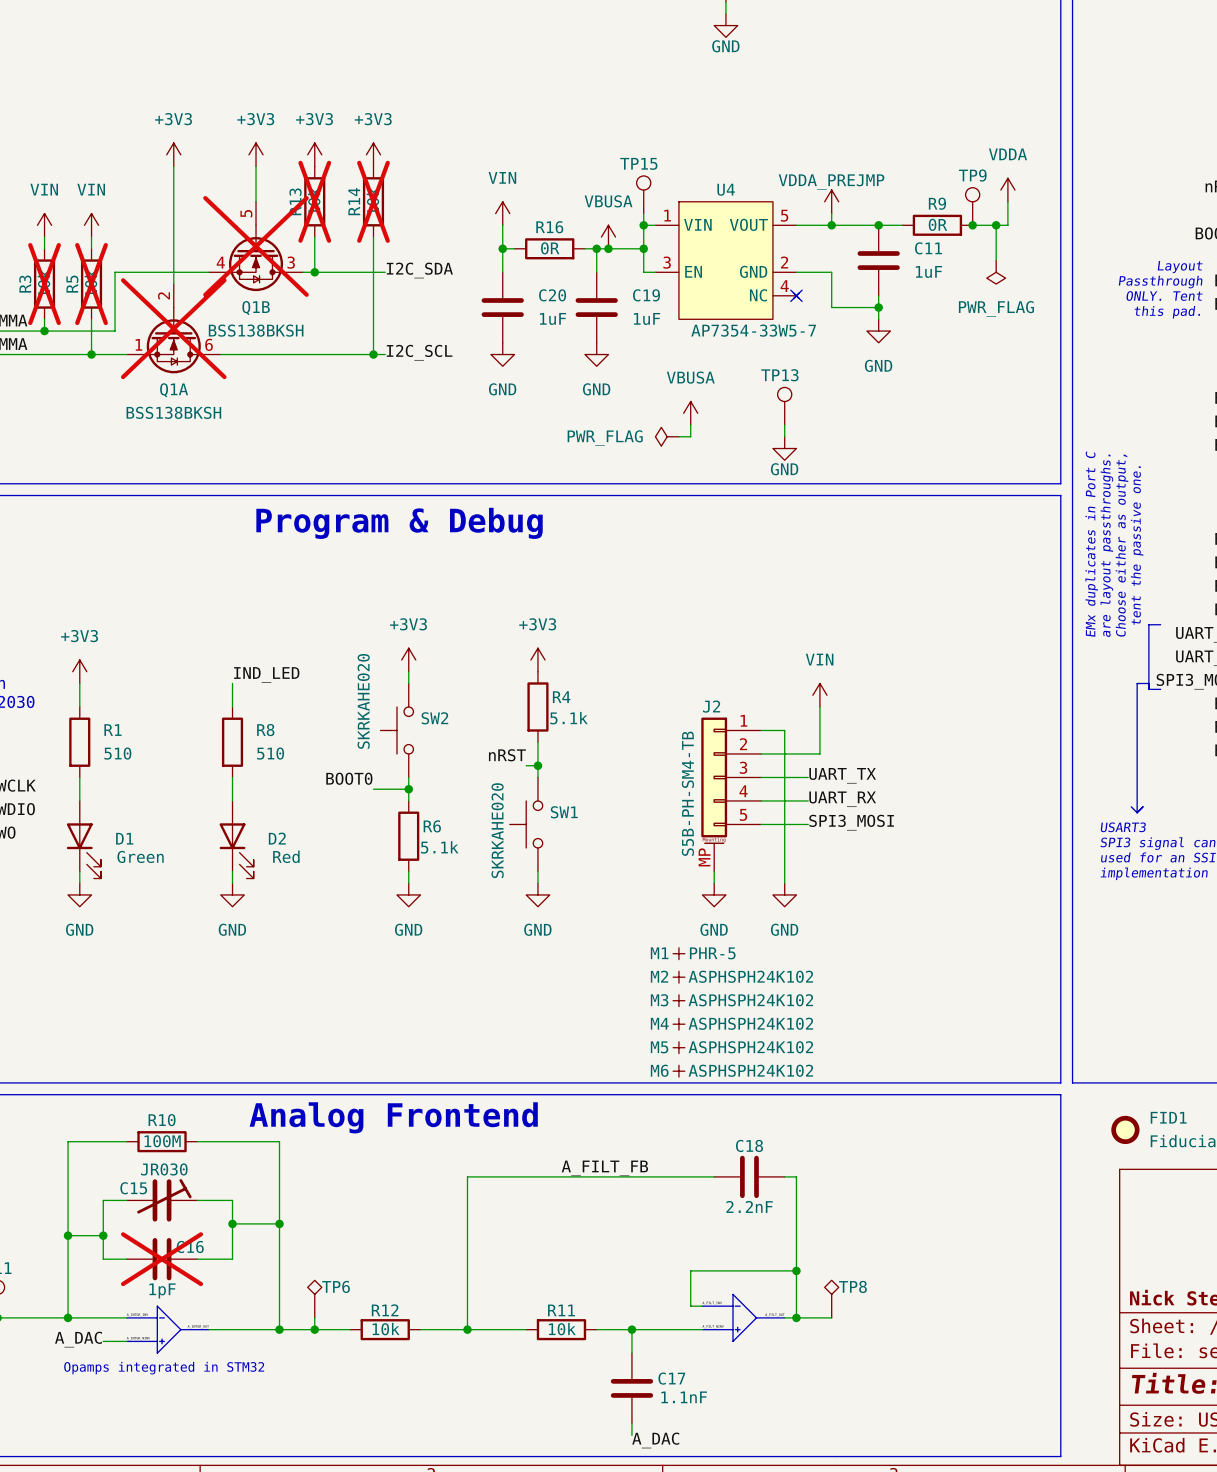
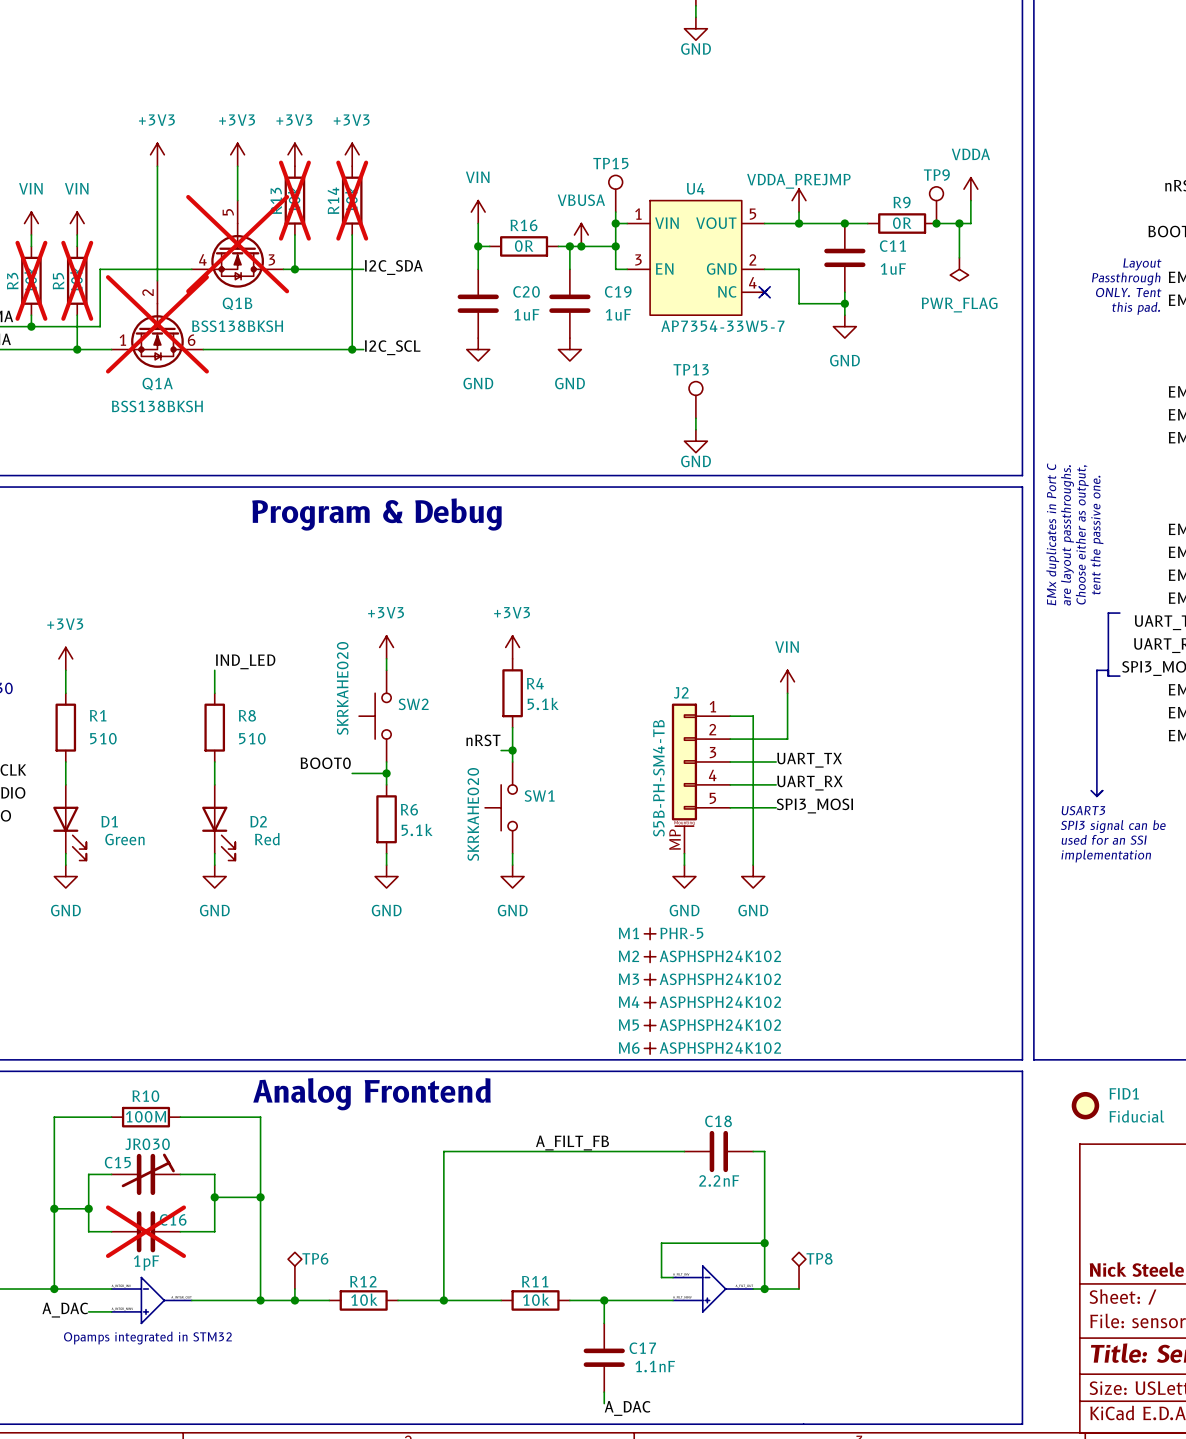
TP13 position: (784, 406) -> (695, 399)
power symbol: VBUSA (690, 413) -> none
wire: (690, 425) (690, 436) (678, 436) -> none
wire: (784, 425) (784, 436) -> (695, 418) (695, 429)
power symbol: PWR_FLAG (667, 436) -> none
power symbol position: GND (784, 448) -> GND (695, 441)

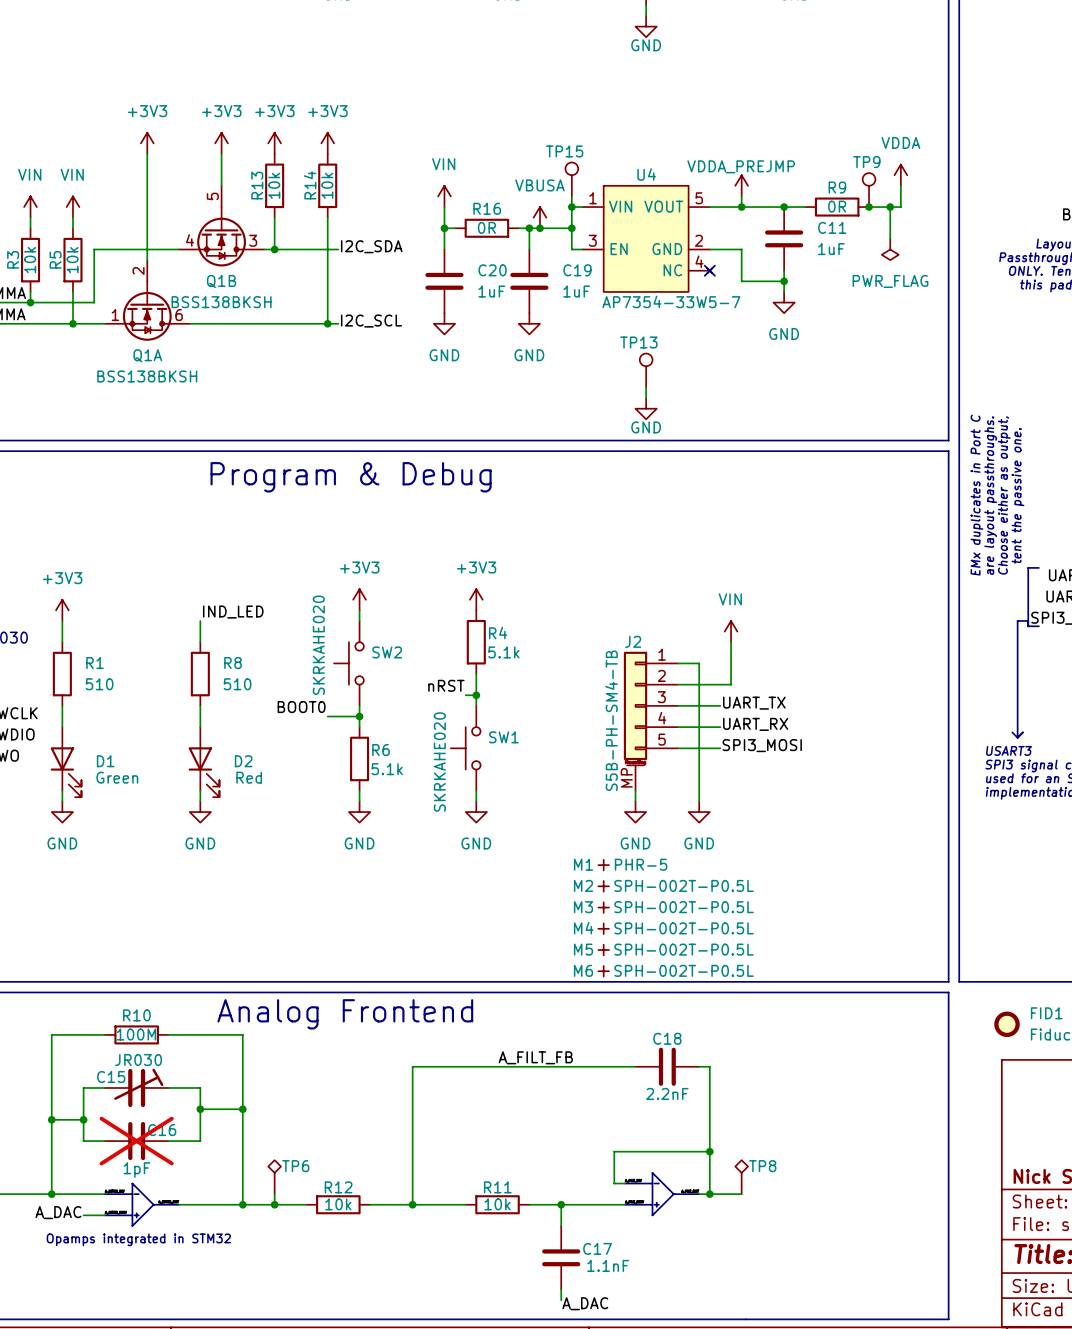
R13 do-not-place cross: (294, 200) -> none
R14 do-not-place cross: (352, 200) -> none
Q1B do-not-place cross: (237, 244) -> none
R3 do-not-place cross: (31, 280) -> none
R5 do-not-place cross: (77, 280) -> none
Q1A do-not-place cross: (157, 324) -> none
M2 value: ASPHSPH24K102 (720, 956) -> SPH-002T-P0.5L (684, 885)
M3 value: ASPHSPH24K102 (720, 979) -> SPH-002T-P0.5L (684, 907)
M4 value: ASPHSPH24K102 (720, 1002) -> SPH-002T-P0.5L (684, 928)
M5 value: ASPHSPH24K102 (720, 1025) -> SPH-002T-P0.5L (684, 949)
M6 value: ASPHSPH24K102 (720, 1048) -> SPH-002T-P0.5L (684, 970)

